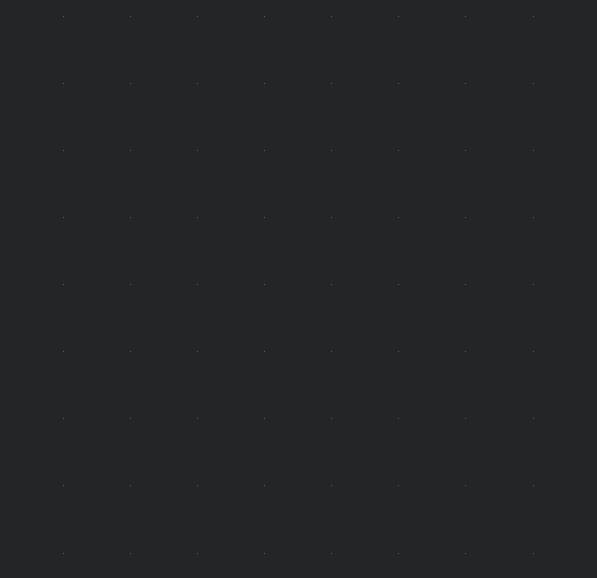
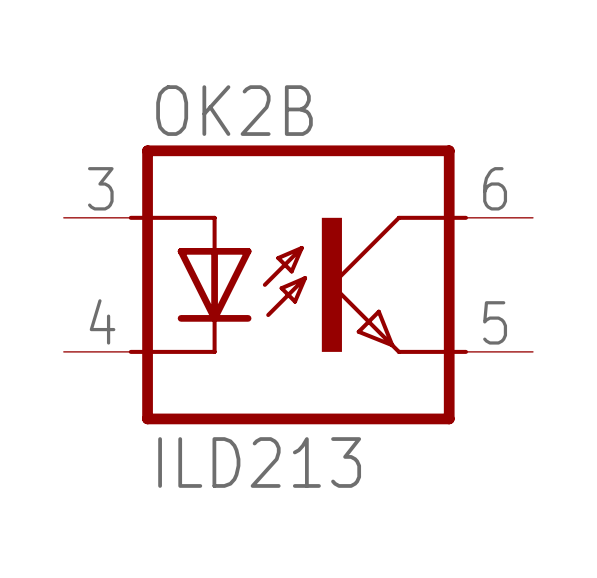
OK2B: none -> ILD213 (298, 284)

